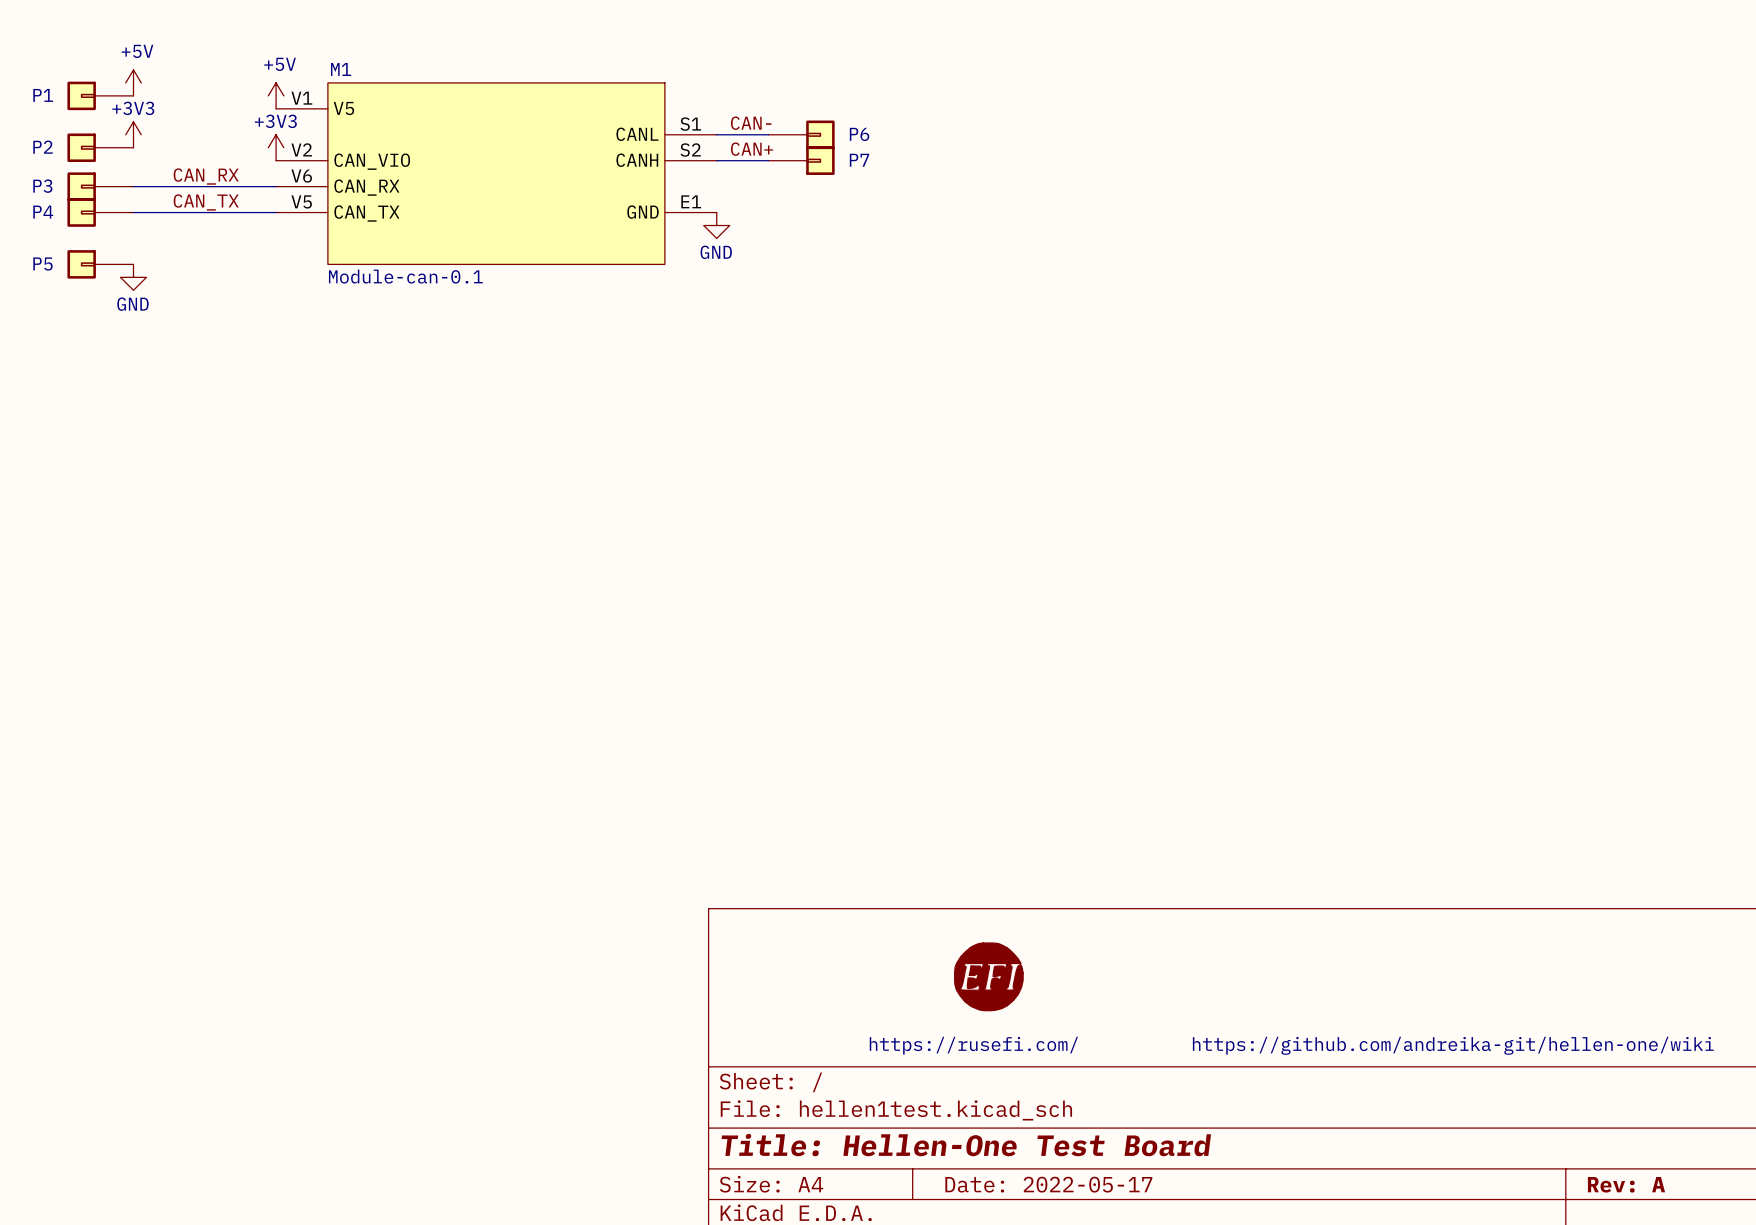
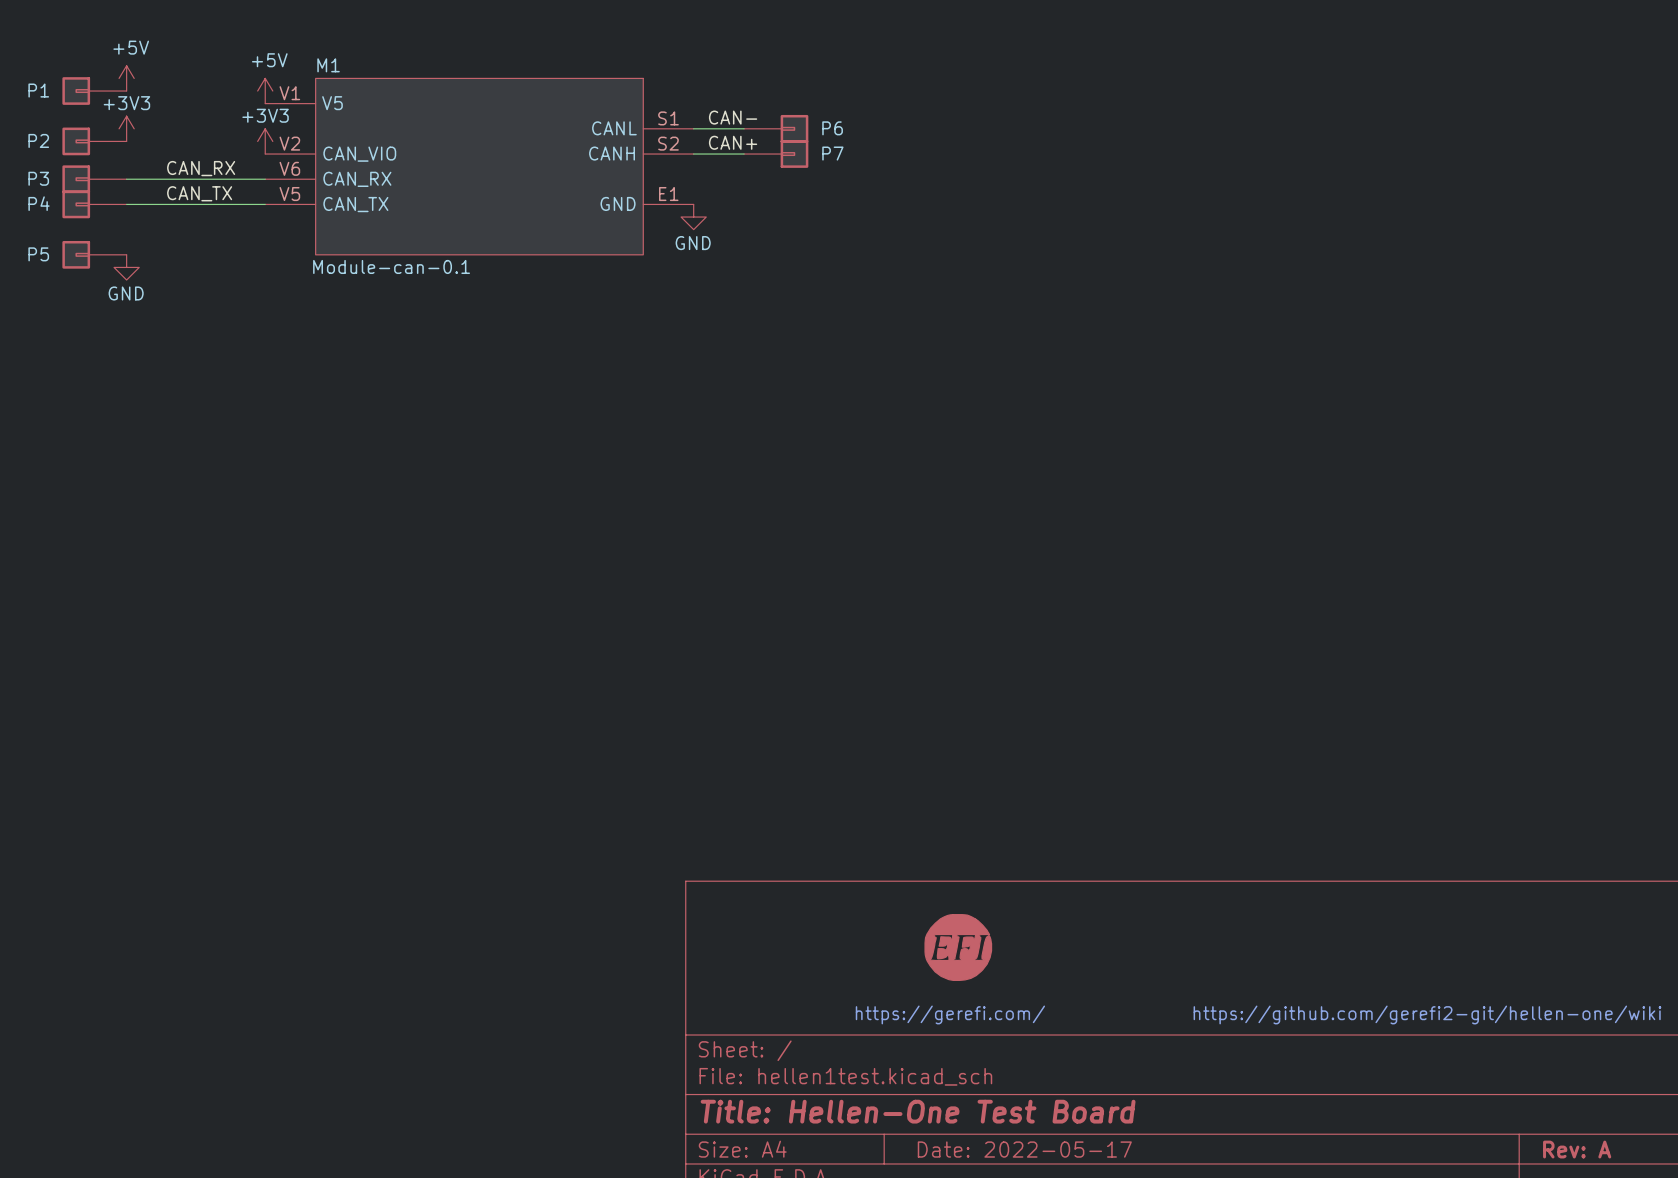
text: https://rusefi.com/ (973, 1045) -> https://gerefi.com/ (950, 1014)
text: https://github.com/andreika-git/hellen-one/wiki (1453, 1045) -> https://github.com/gerefi2-git/hellen-one/wiki (1427, 1014)

